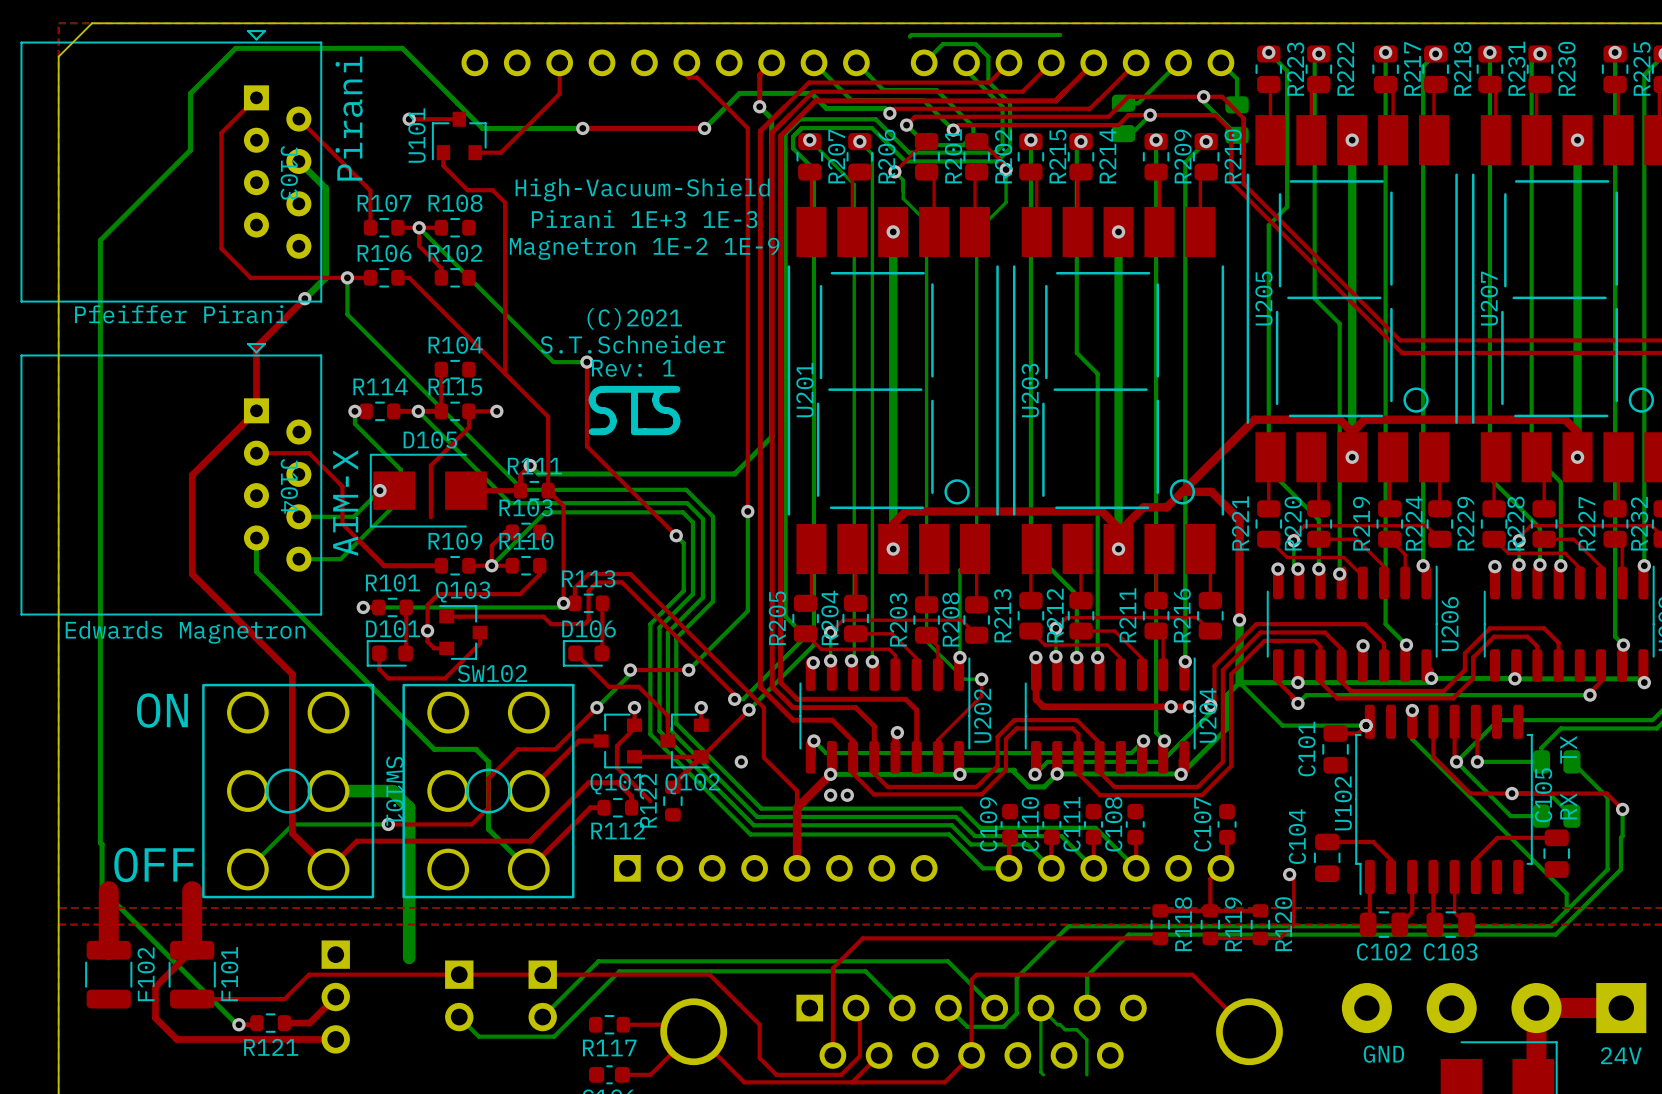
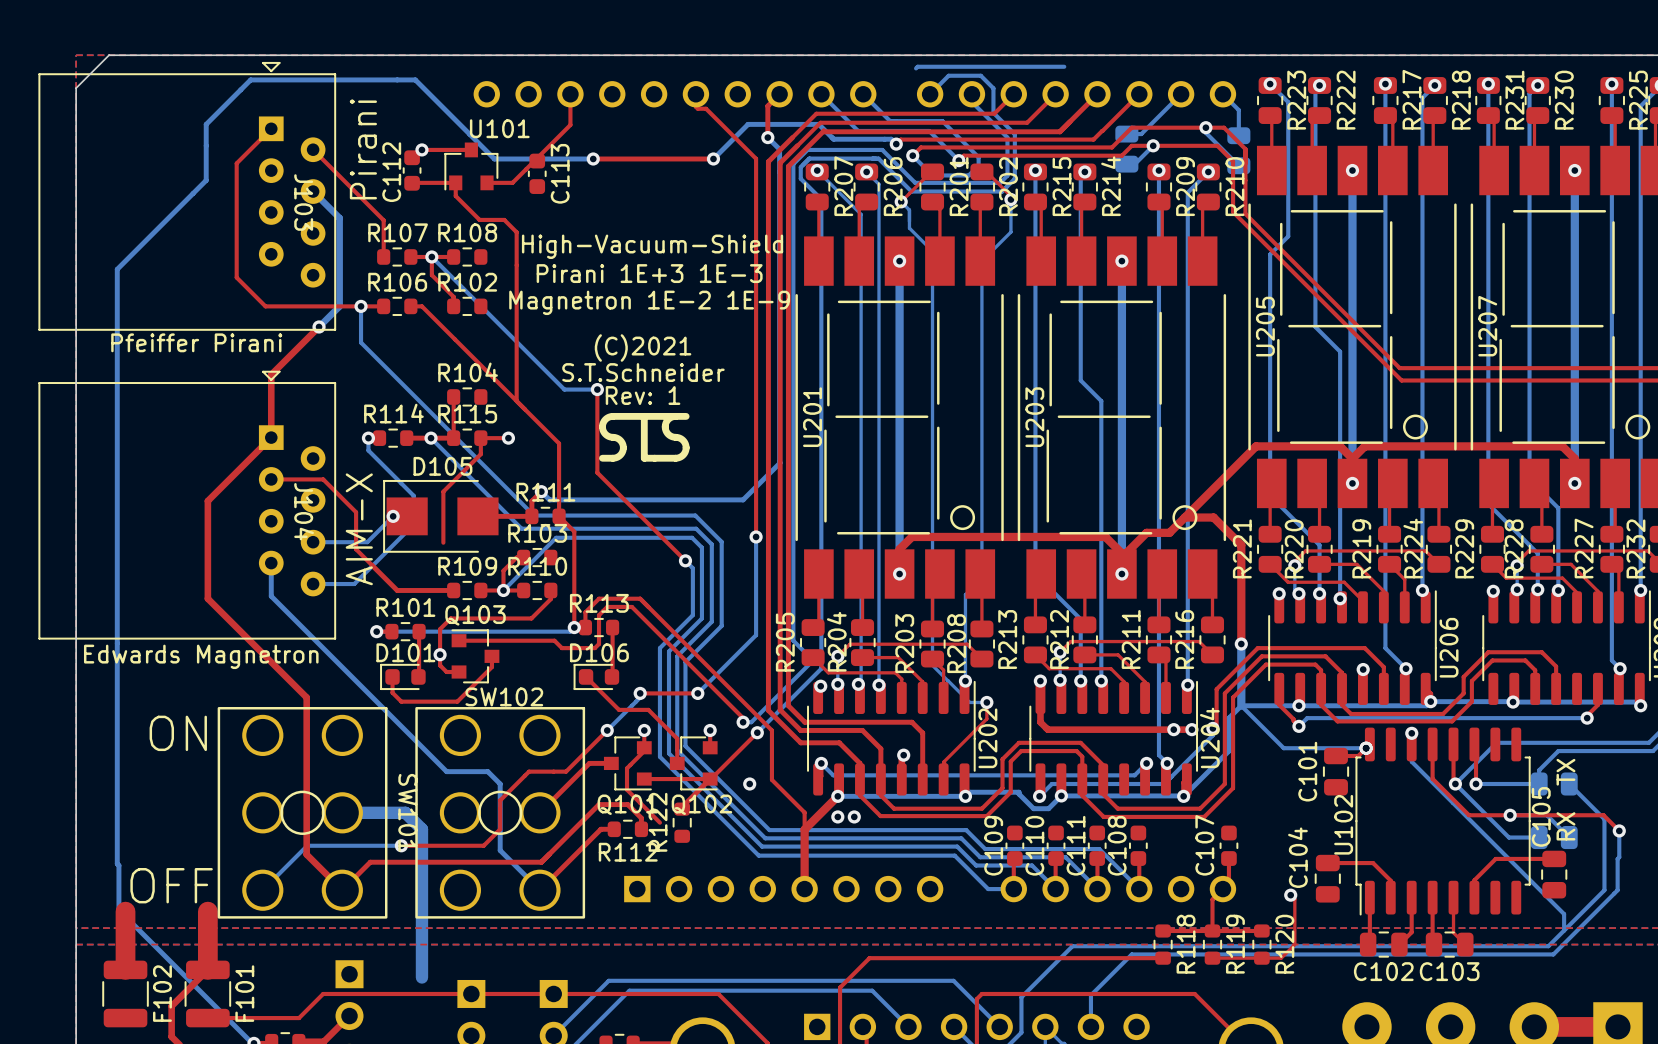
U101 name rotation: 0° (416, 135) -> 90° clockwise (499, 128)
U101 name position: U101 (416, 135) -> U101 (499, 128)
C112: none -> (412, 170)
C113: none -> (537, 173)
top track: none -> (455, 182) (412, 183)
text: High-Vacuum-Shield (642, 189) -> none
text: Pirani 1E+3 1E-3 (644, 219) -> High-Vacuum-Shield (652, 246)
text: Magnetron 1E-2 1E-9 (644, 248) -> Pirani 1E+3 1E-3 (649, 273)
text: none -> Magnetron 1E-2 1E-9 (649, 302)

